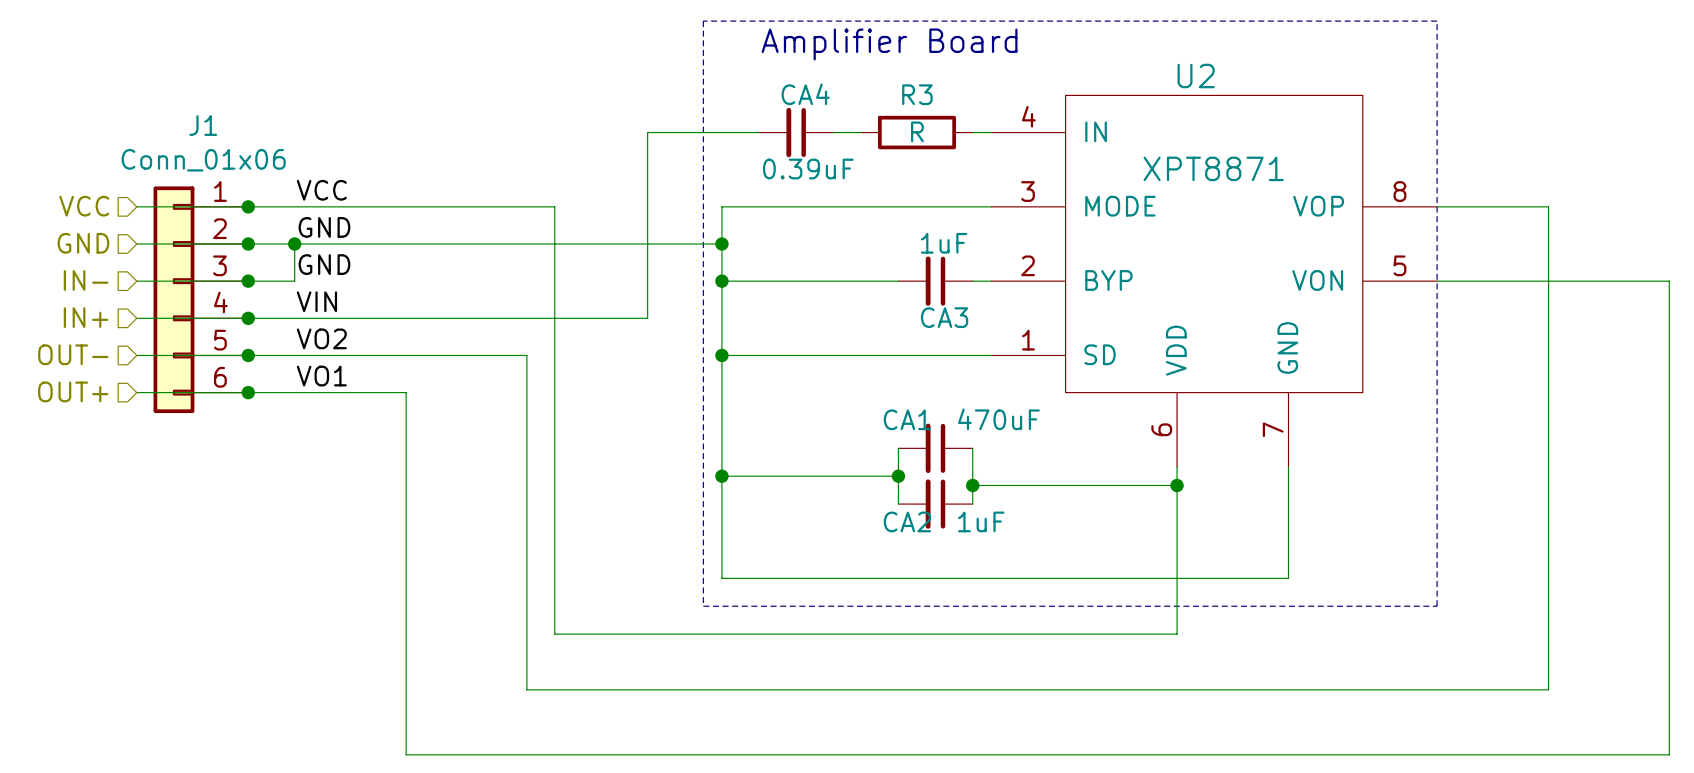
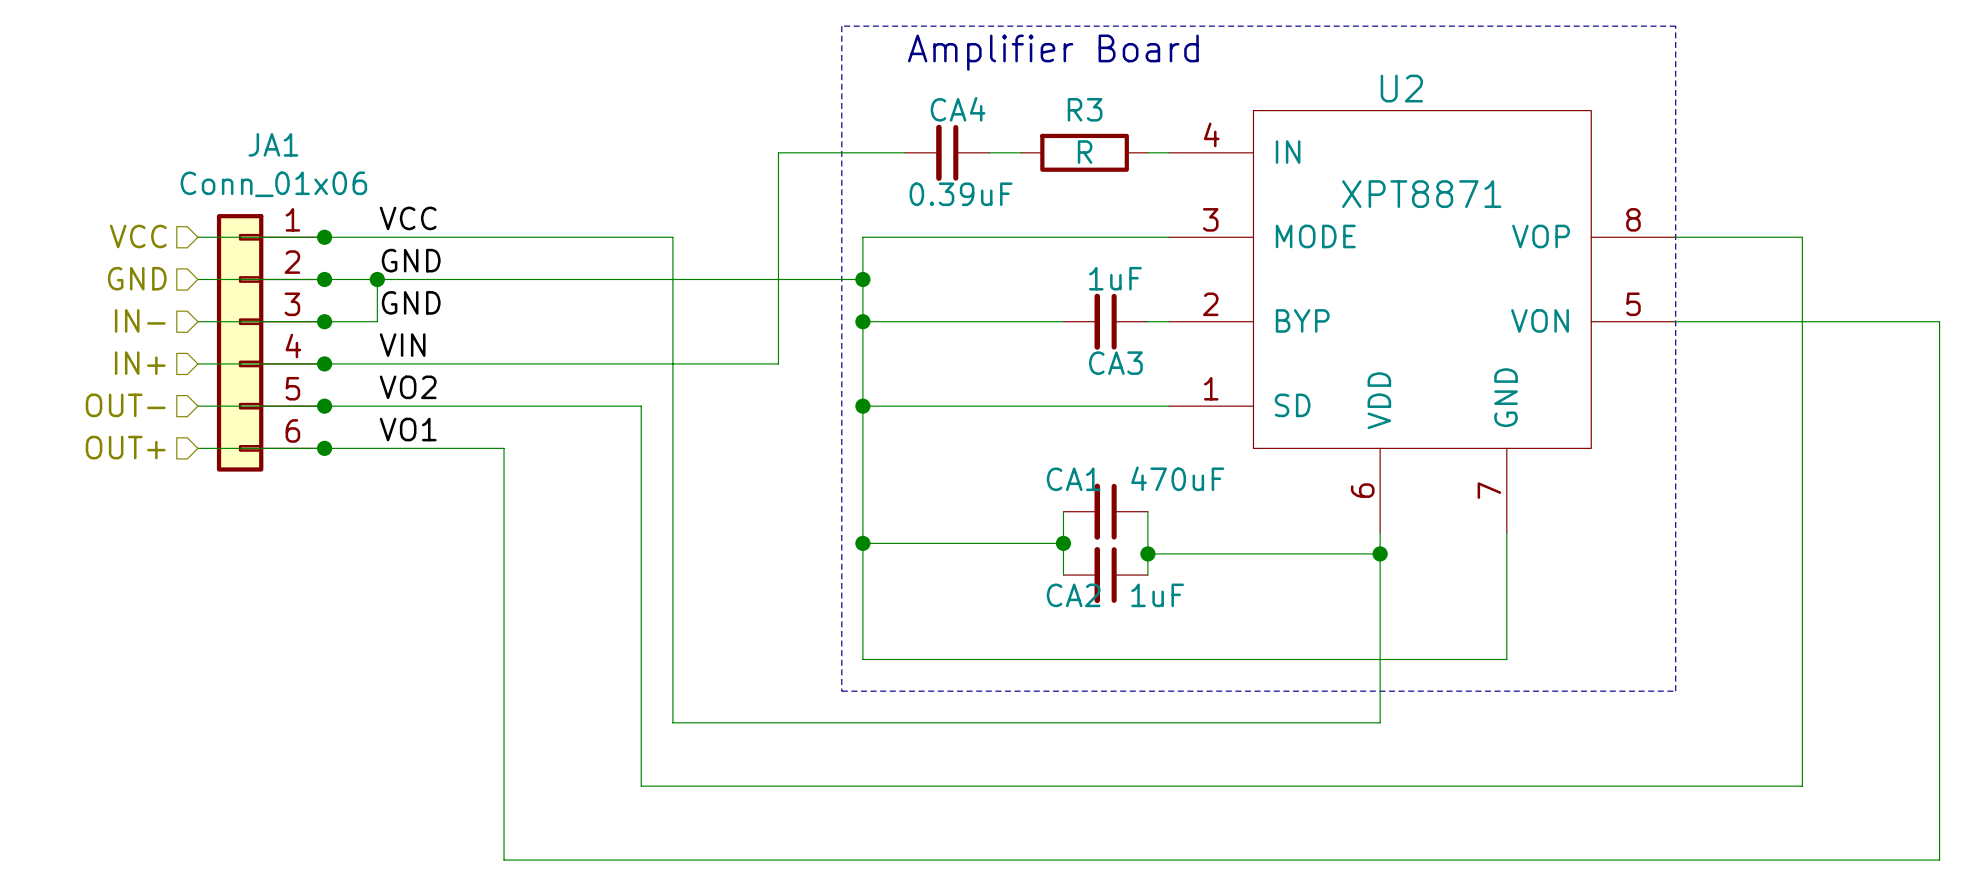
J1 name: J1 (203, 125) -> JA1 (273, 144)

